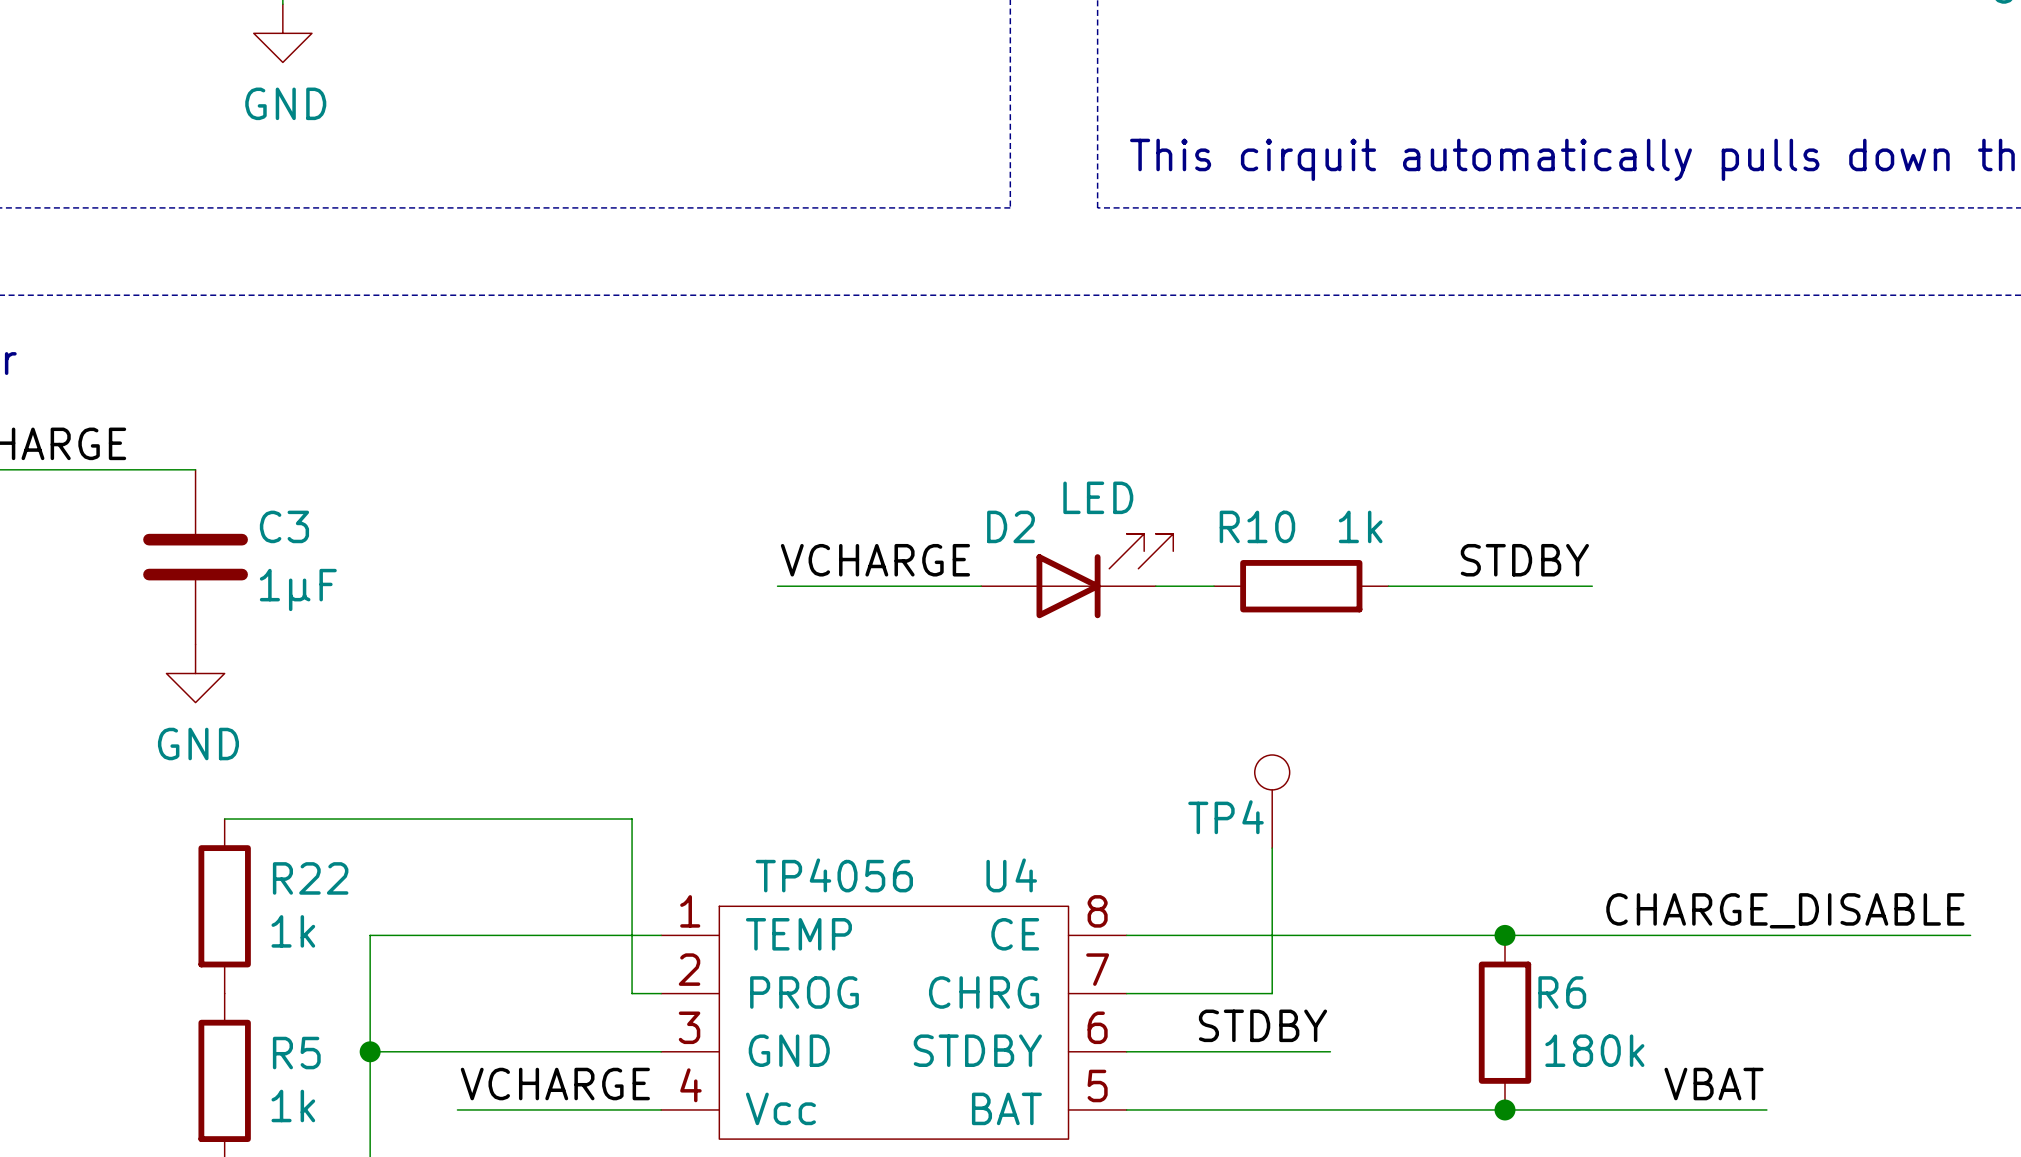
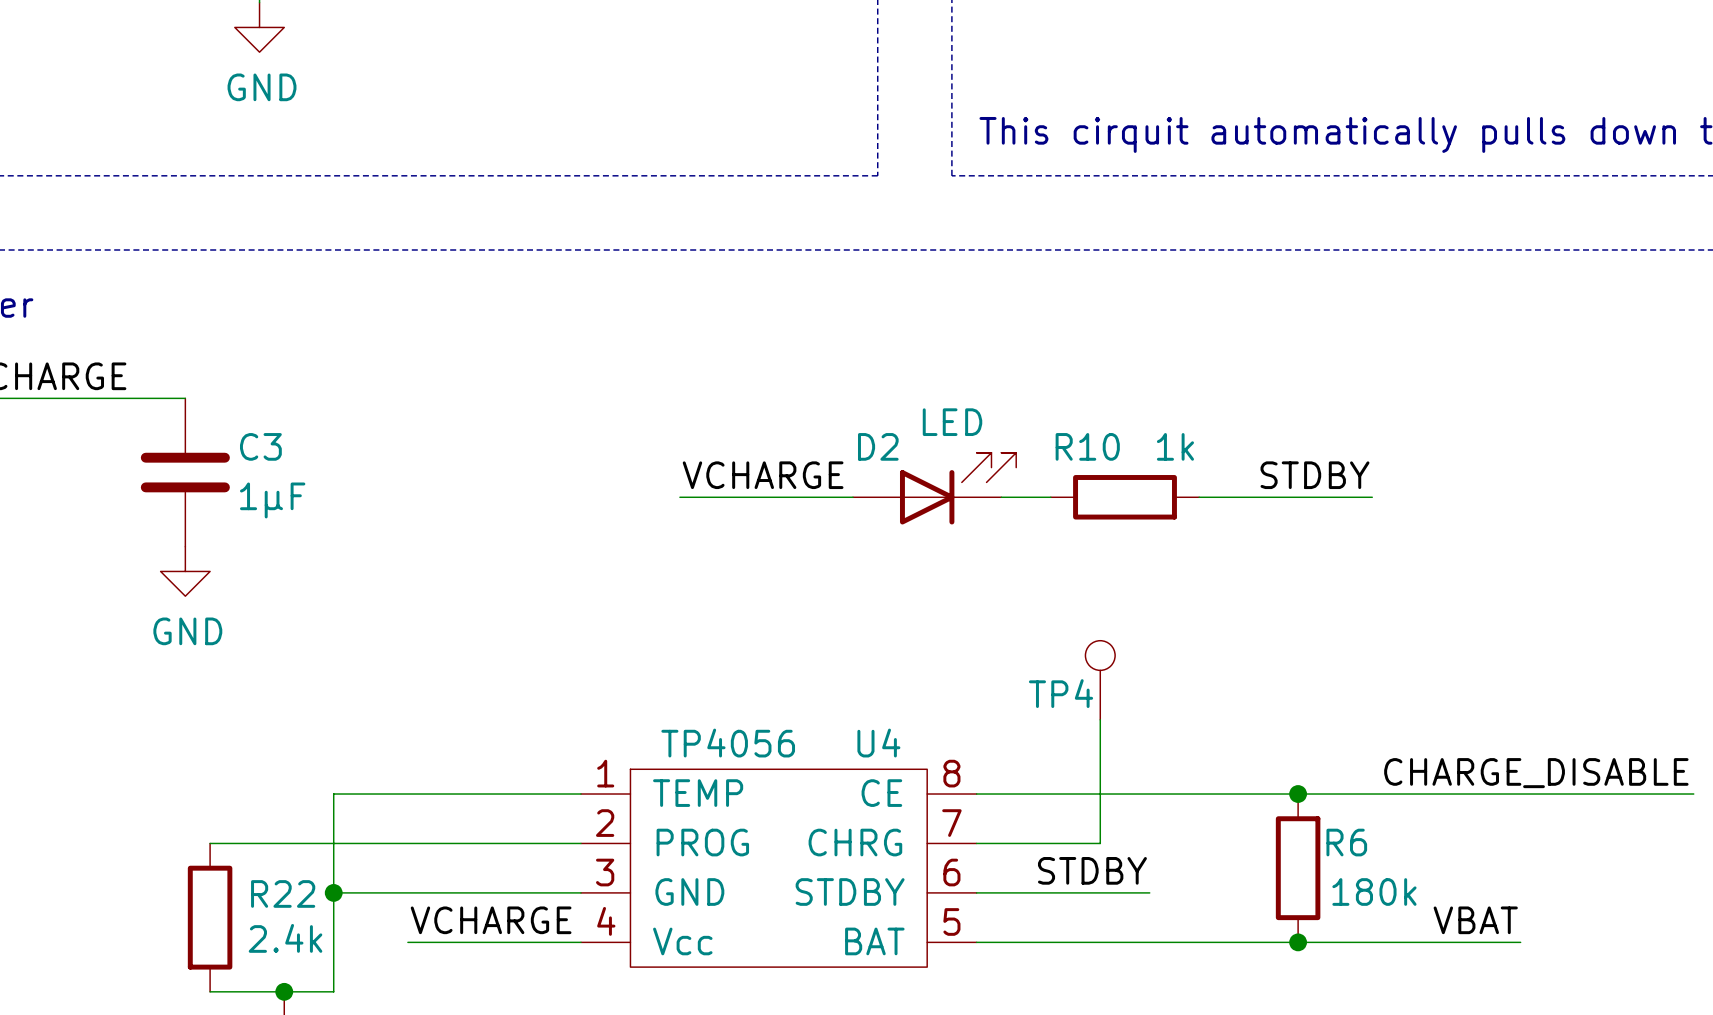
wire: (224, 819) (632, 819) (632, 993) -> (210, 843) (556, 843)
R22: 1k (224, 906) -> none
R5 name: R5 (296, 1053) -> R22 (283, 893)
R5 value: 1k (293, 1105) -> 2.4k (285, 938)

